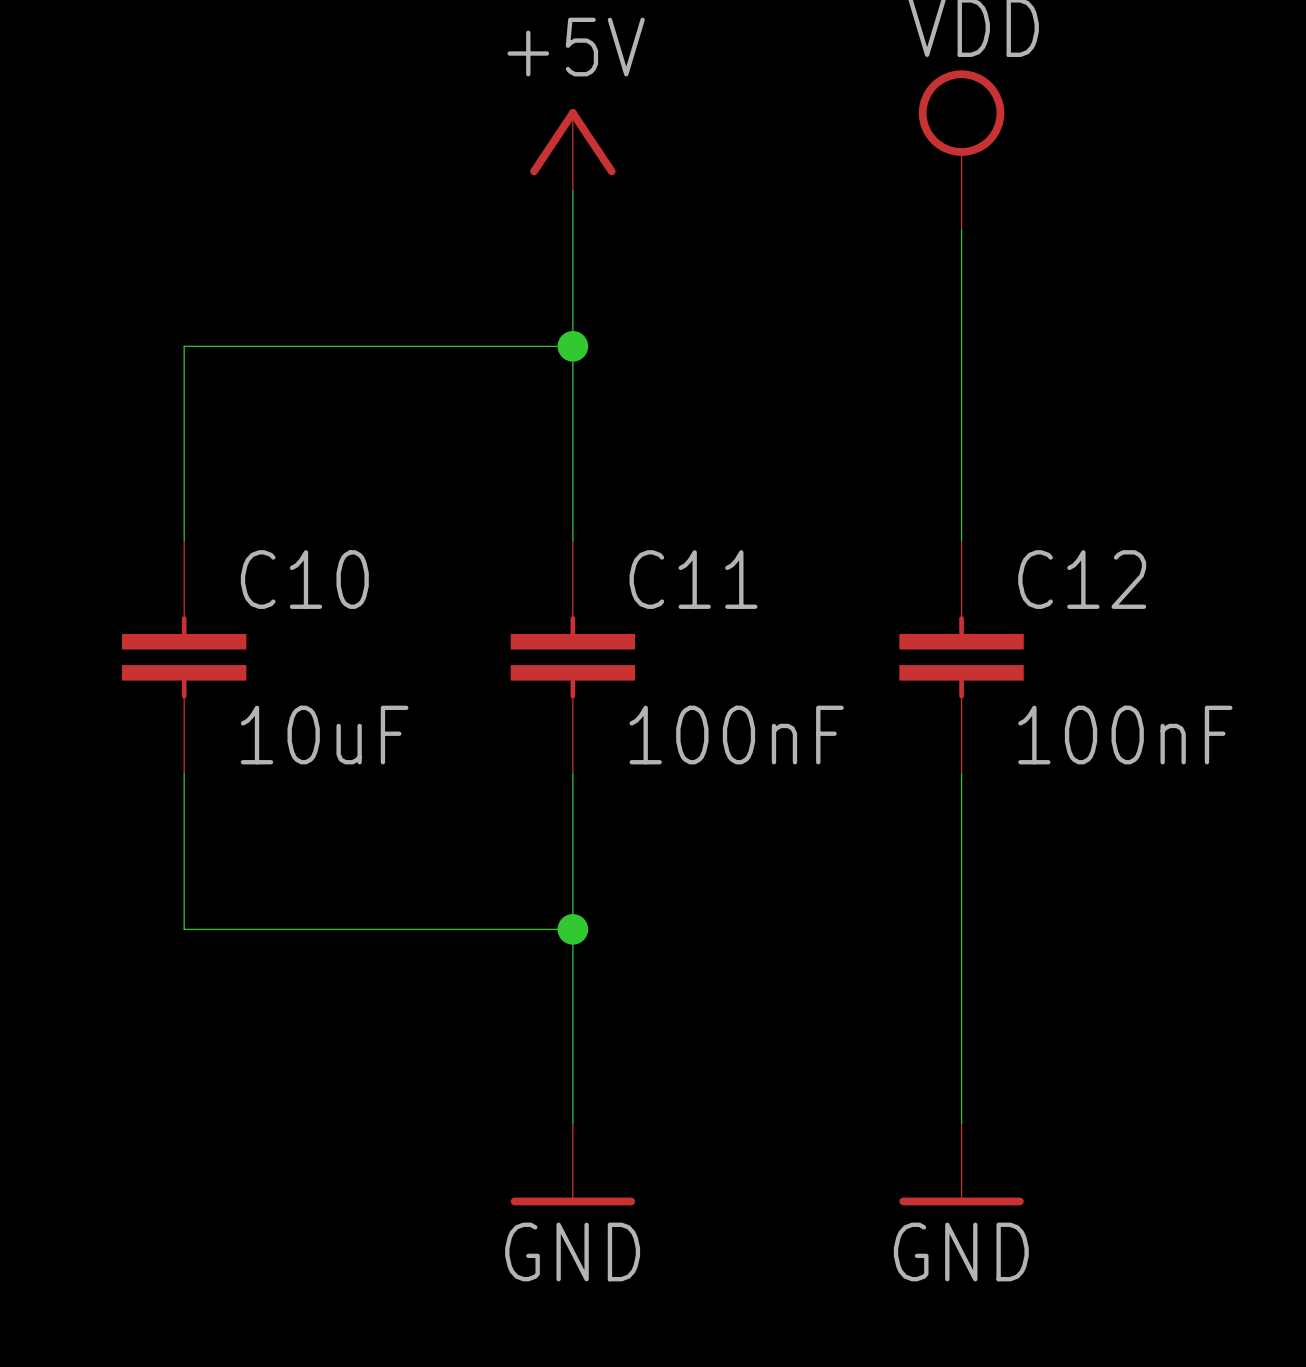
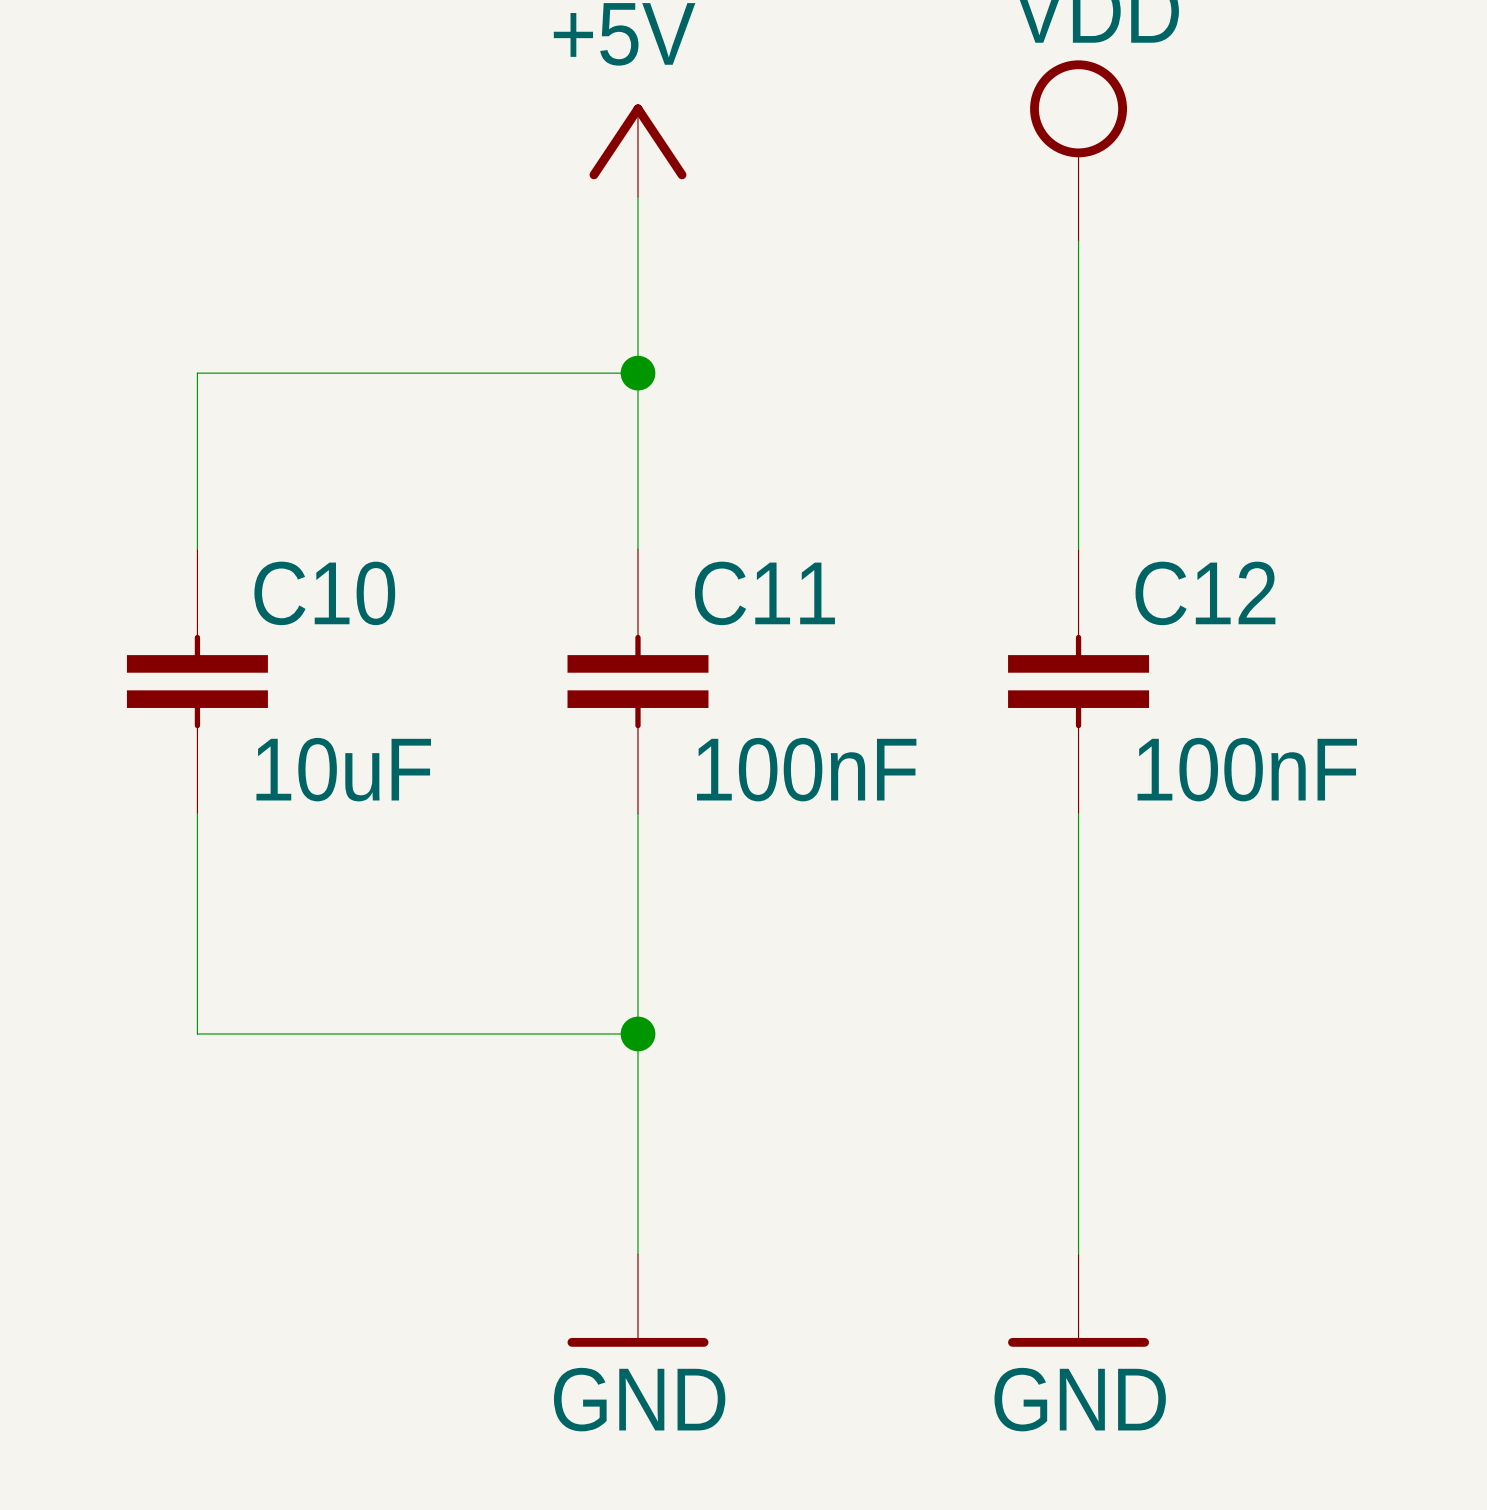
C10 position: (184, 657) -> (197, 681)
C11 position: (572, 657) -> (637, 681)
C12 position: (961, 657) -> (1078, 681)

